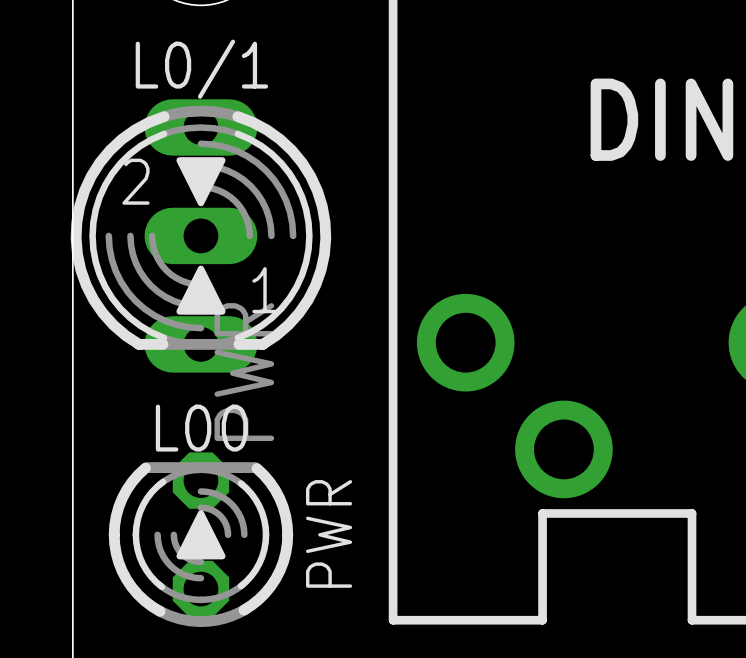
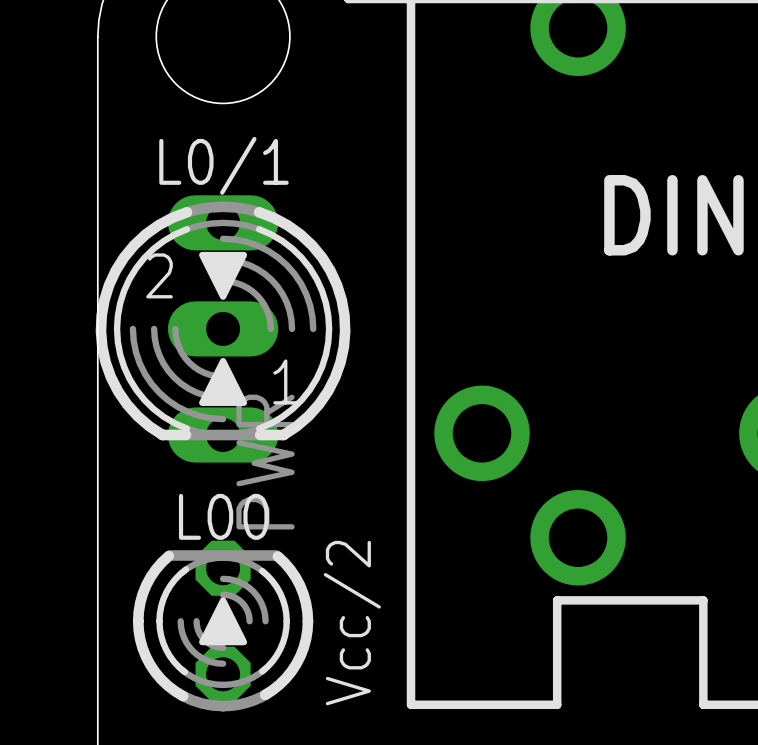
text: PWR (329, 533) -> Vcc/2 (352, 623)

